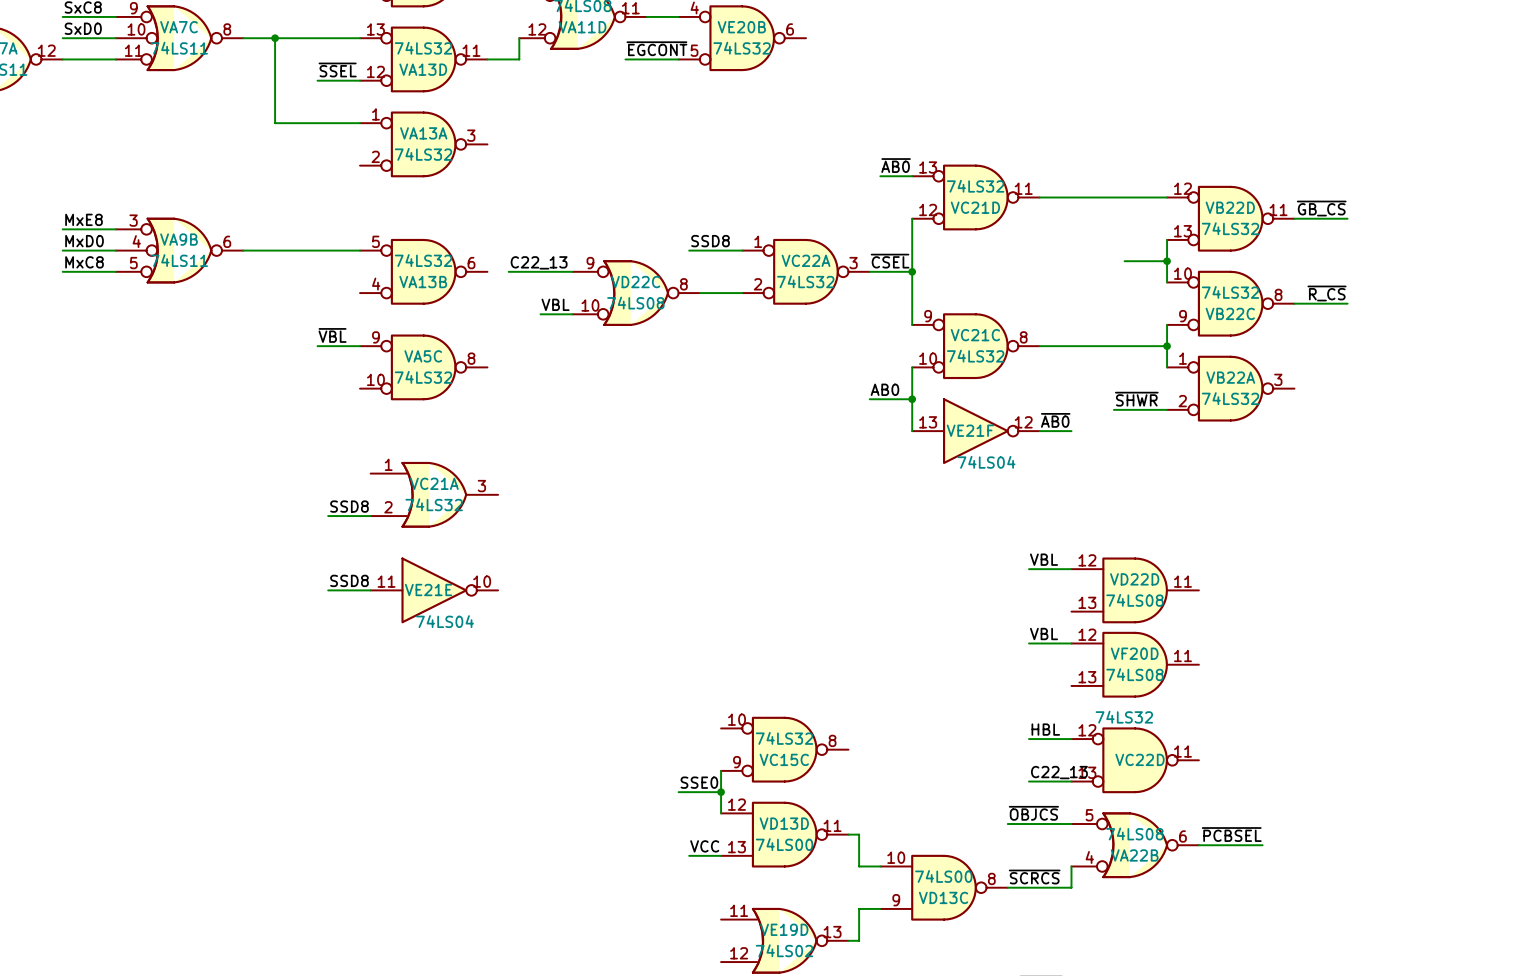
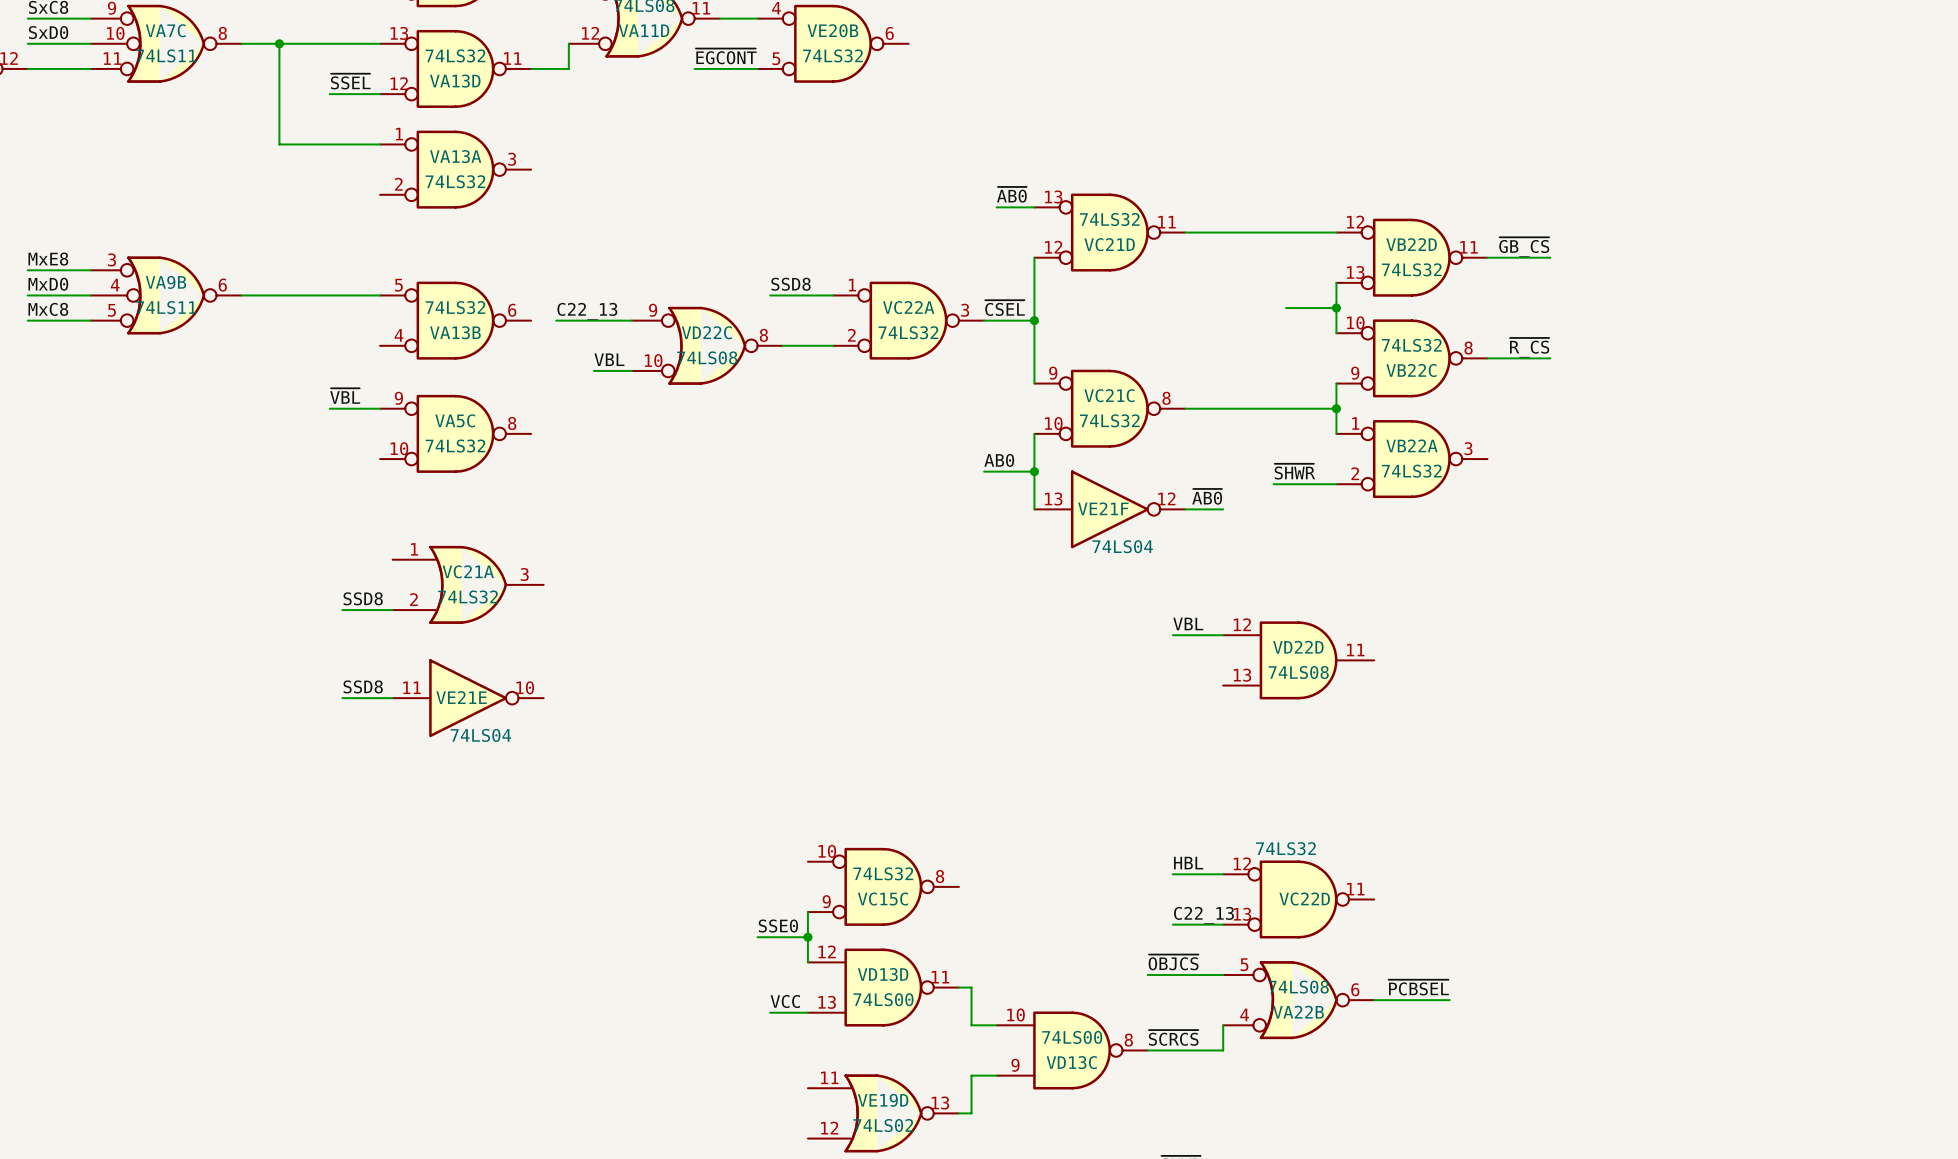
label position: VBL (1044, 559) -> VBL (1188, 623)
wire: (1029, 569) (1071, 569) -> (1172, 635) (1223, 635)
VD22D position: (1135, 590) -> (1298, 660)
label: VBL (1044, 634) -> none
wire: (1029, 643) (1071, 643) -> none
VF20D: 74LS08 (1135, 664) -> none

